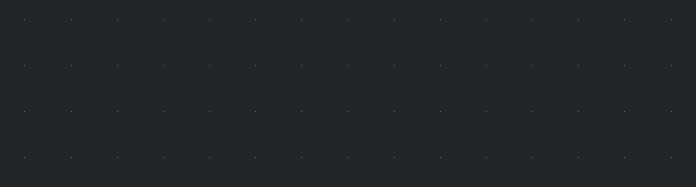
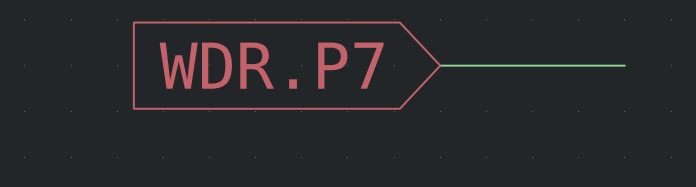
global label: none -> WDR.P7 (271, 65)
wire: none -> (440, 65) (624, 65)

